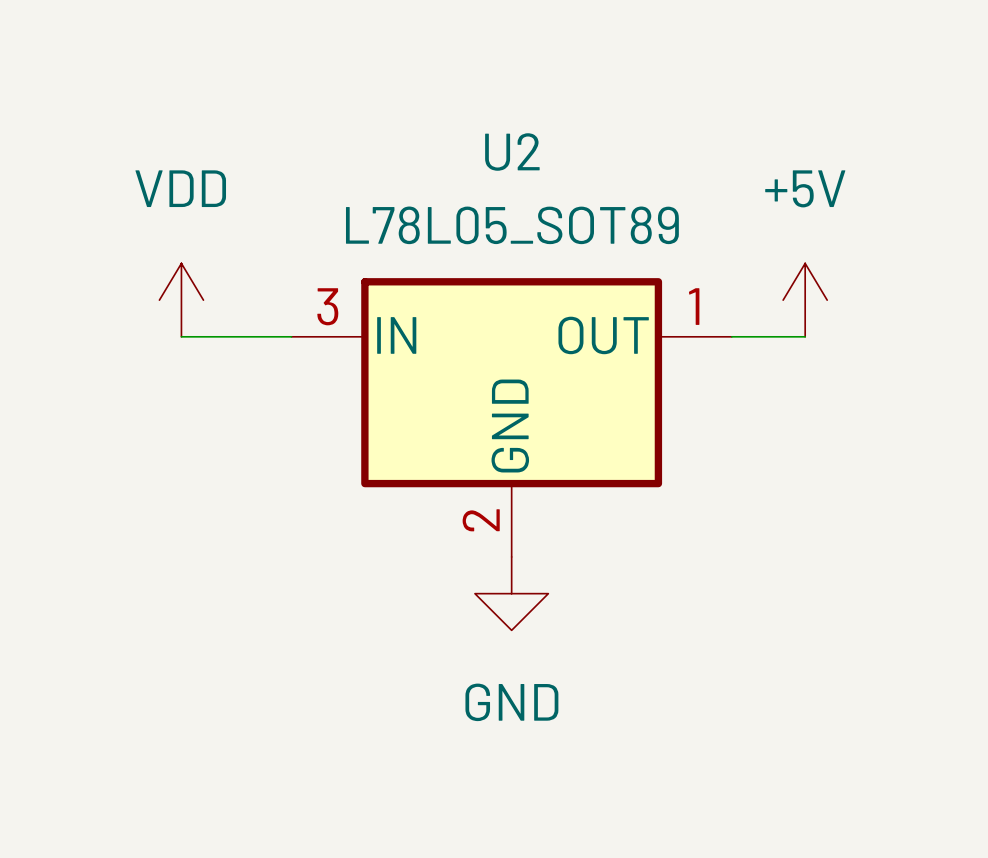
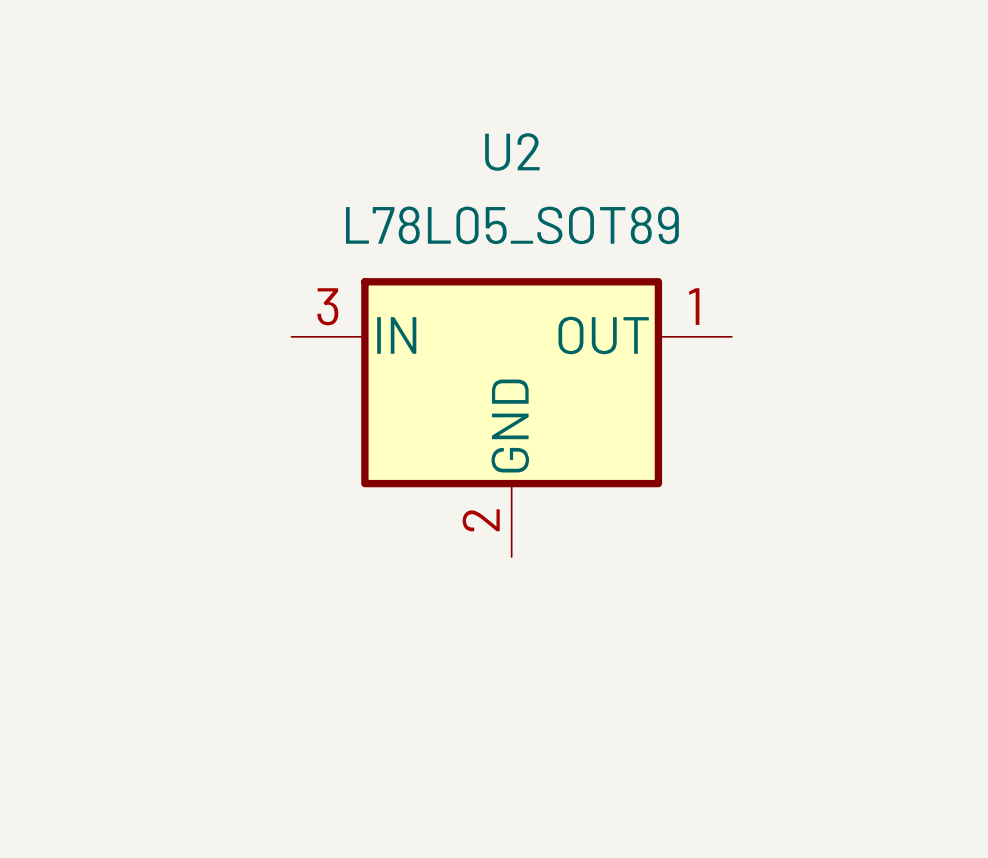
power symbol: VDD (181, 300) -> none
power symbol: +5V (805, 300) -> none
wire: (181, 336) (291, 336) -> none
wire: (731, 336) (805, 336) -> none
power symbol: GND (511, 593) -> none

